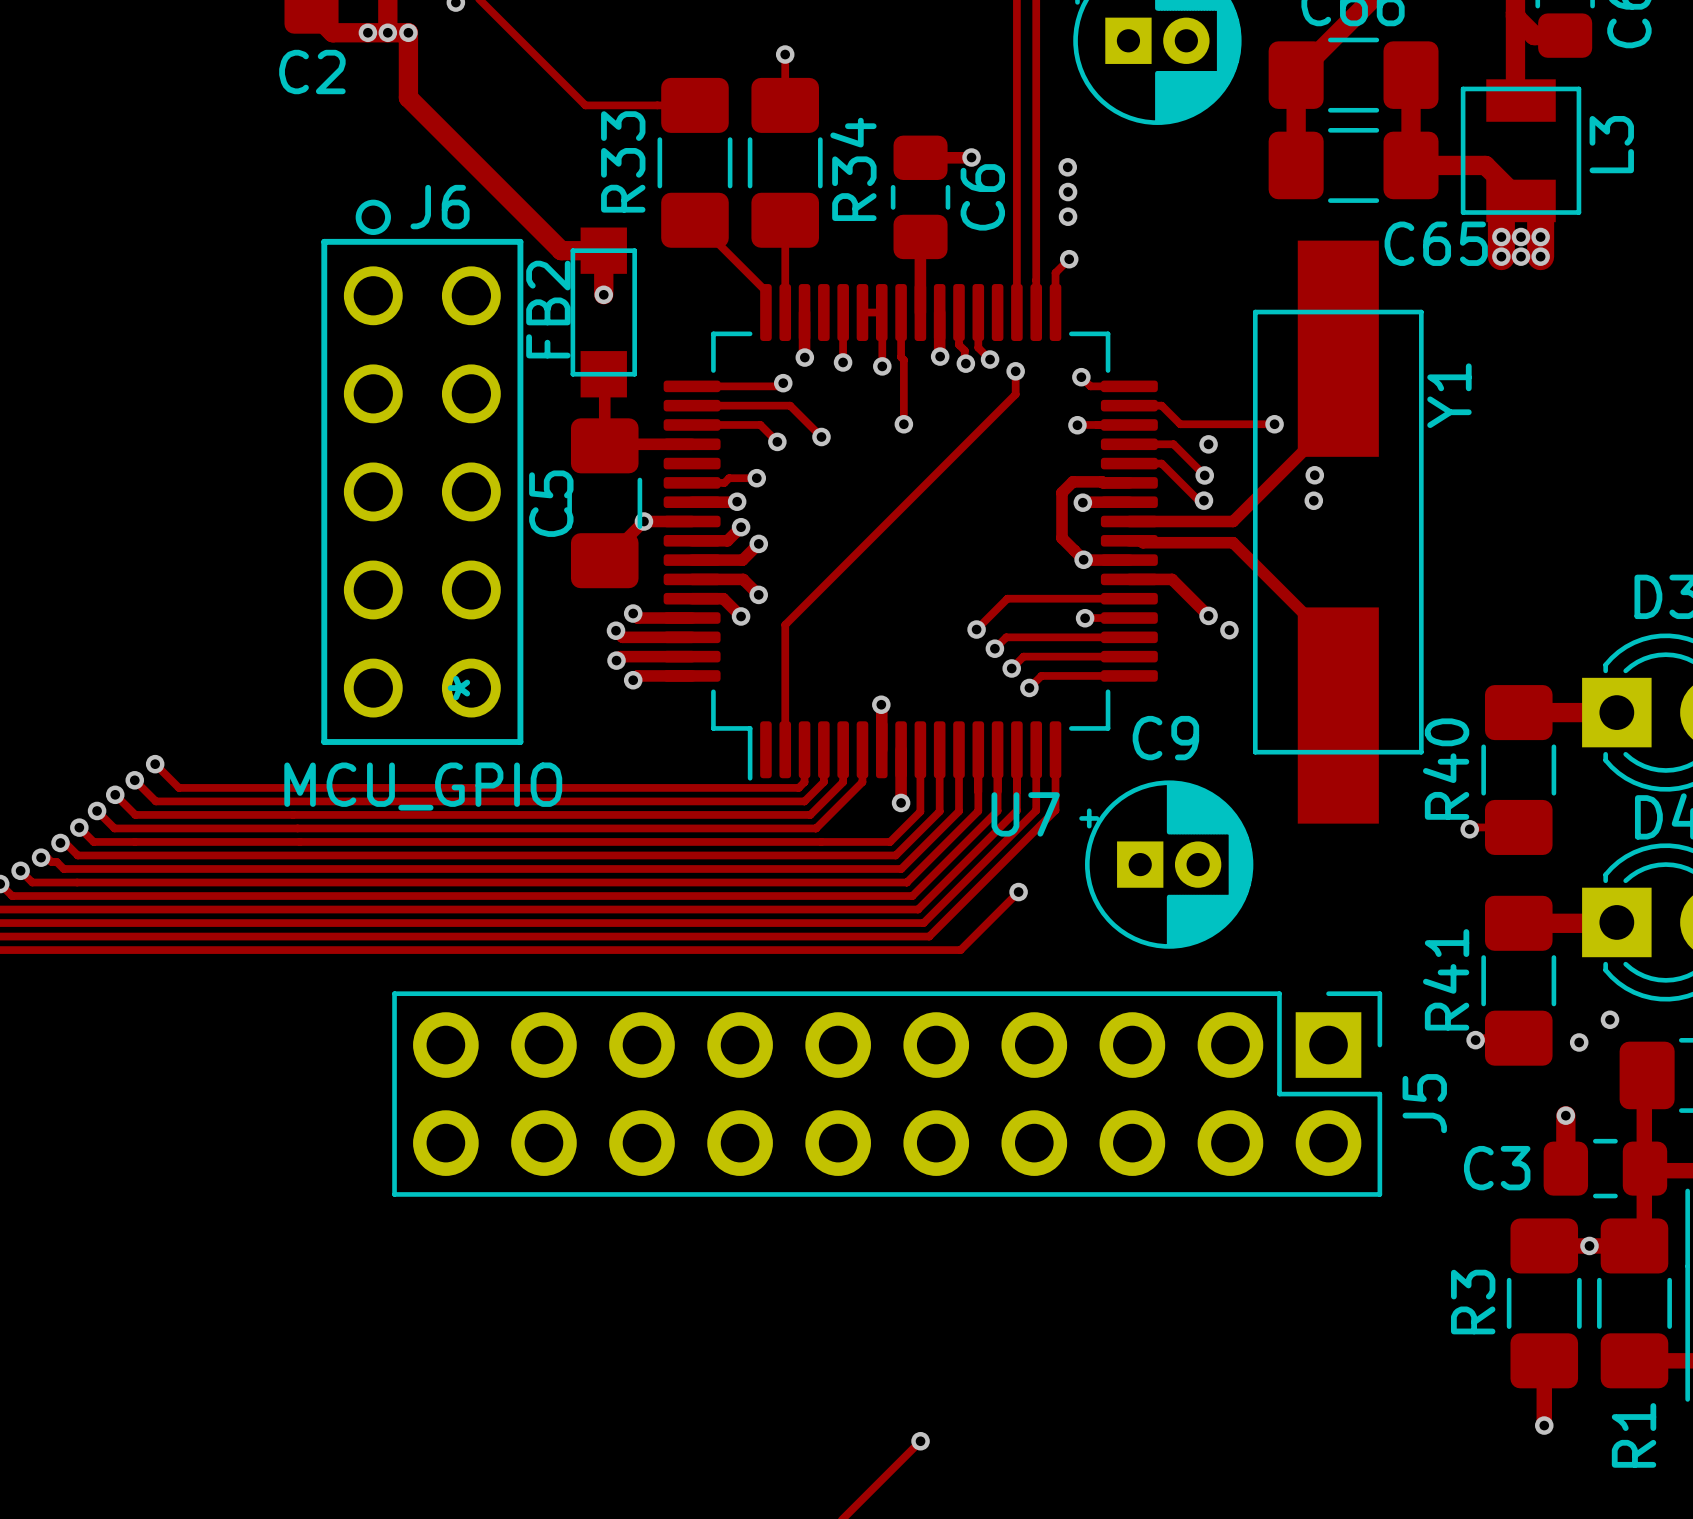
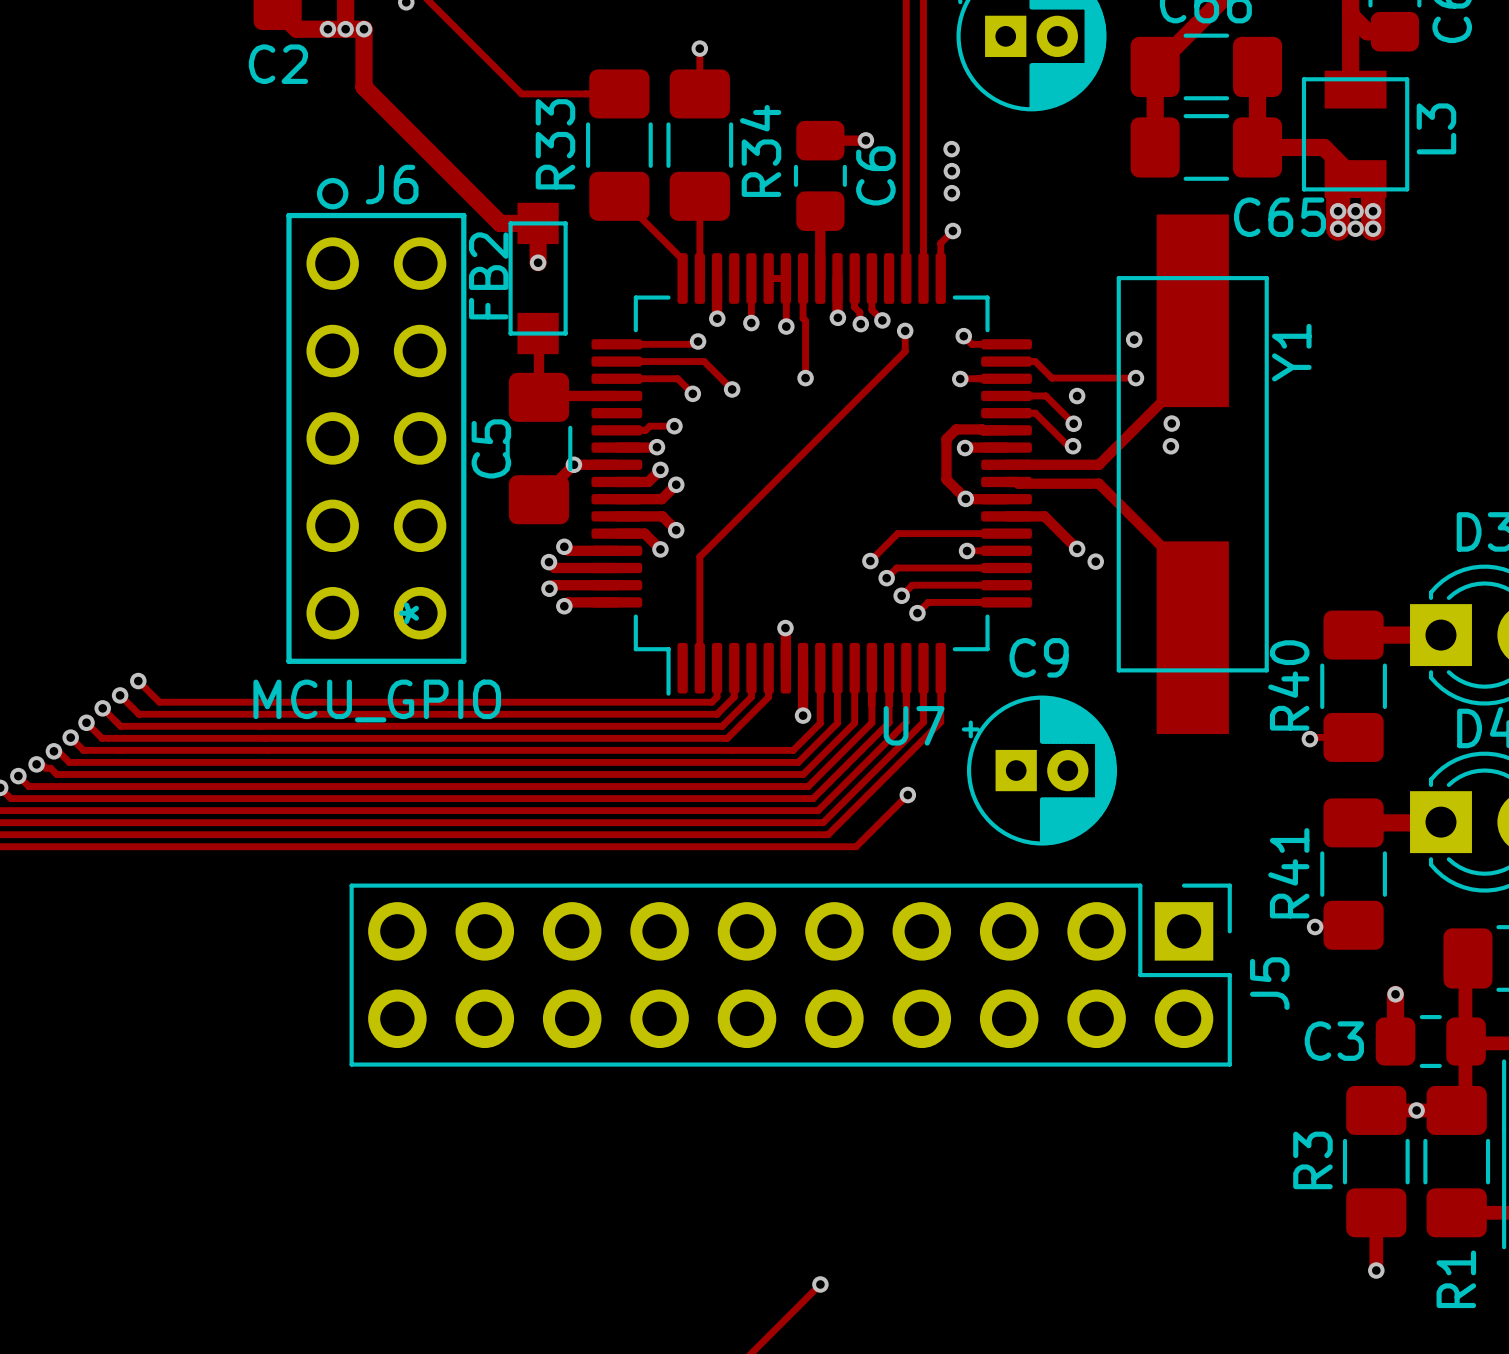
via: none -> (1134, 339)
via: (1610, 1019) -> none
via: (1579, 1042) -> none

